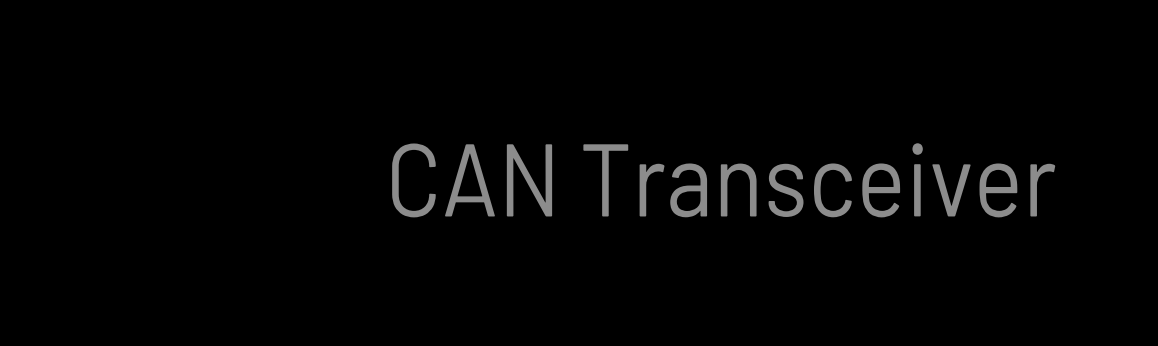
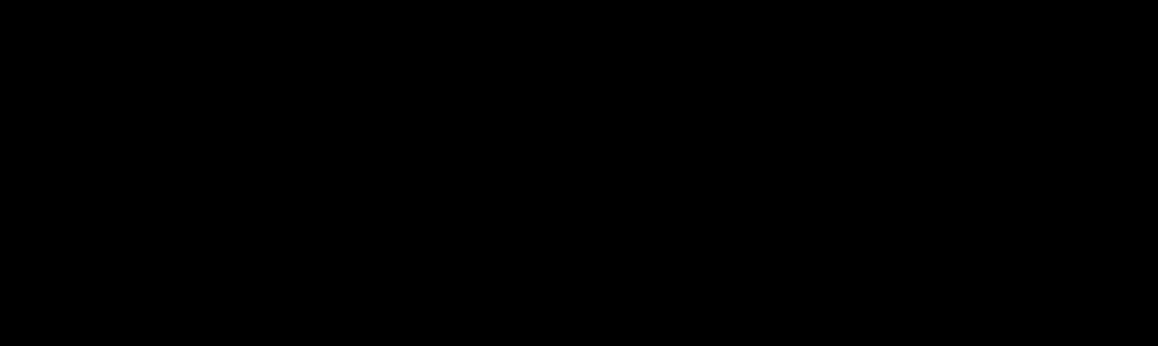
text: CAN Transceiver (723, 180) -> none

